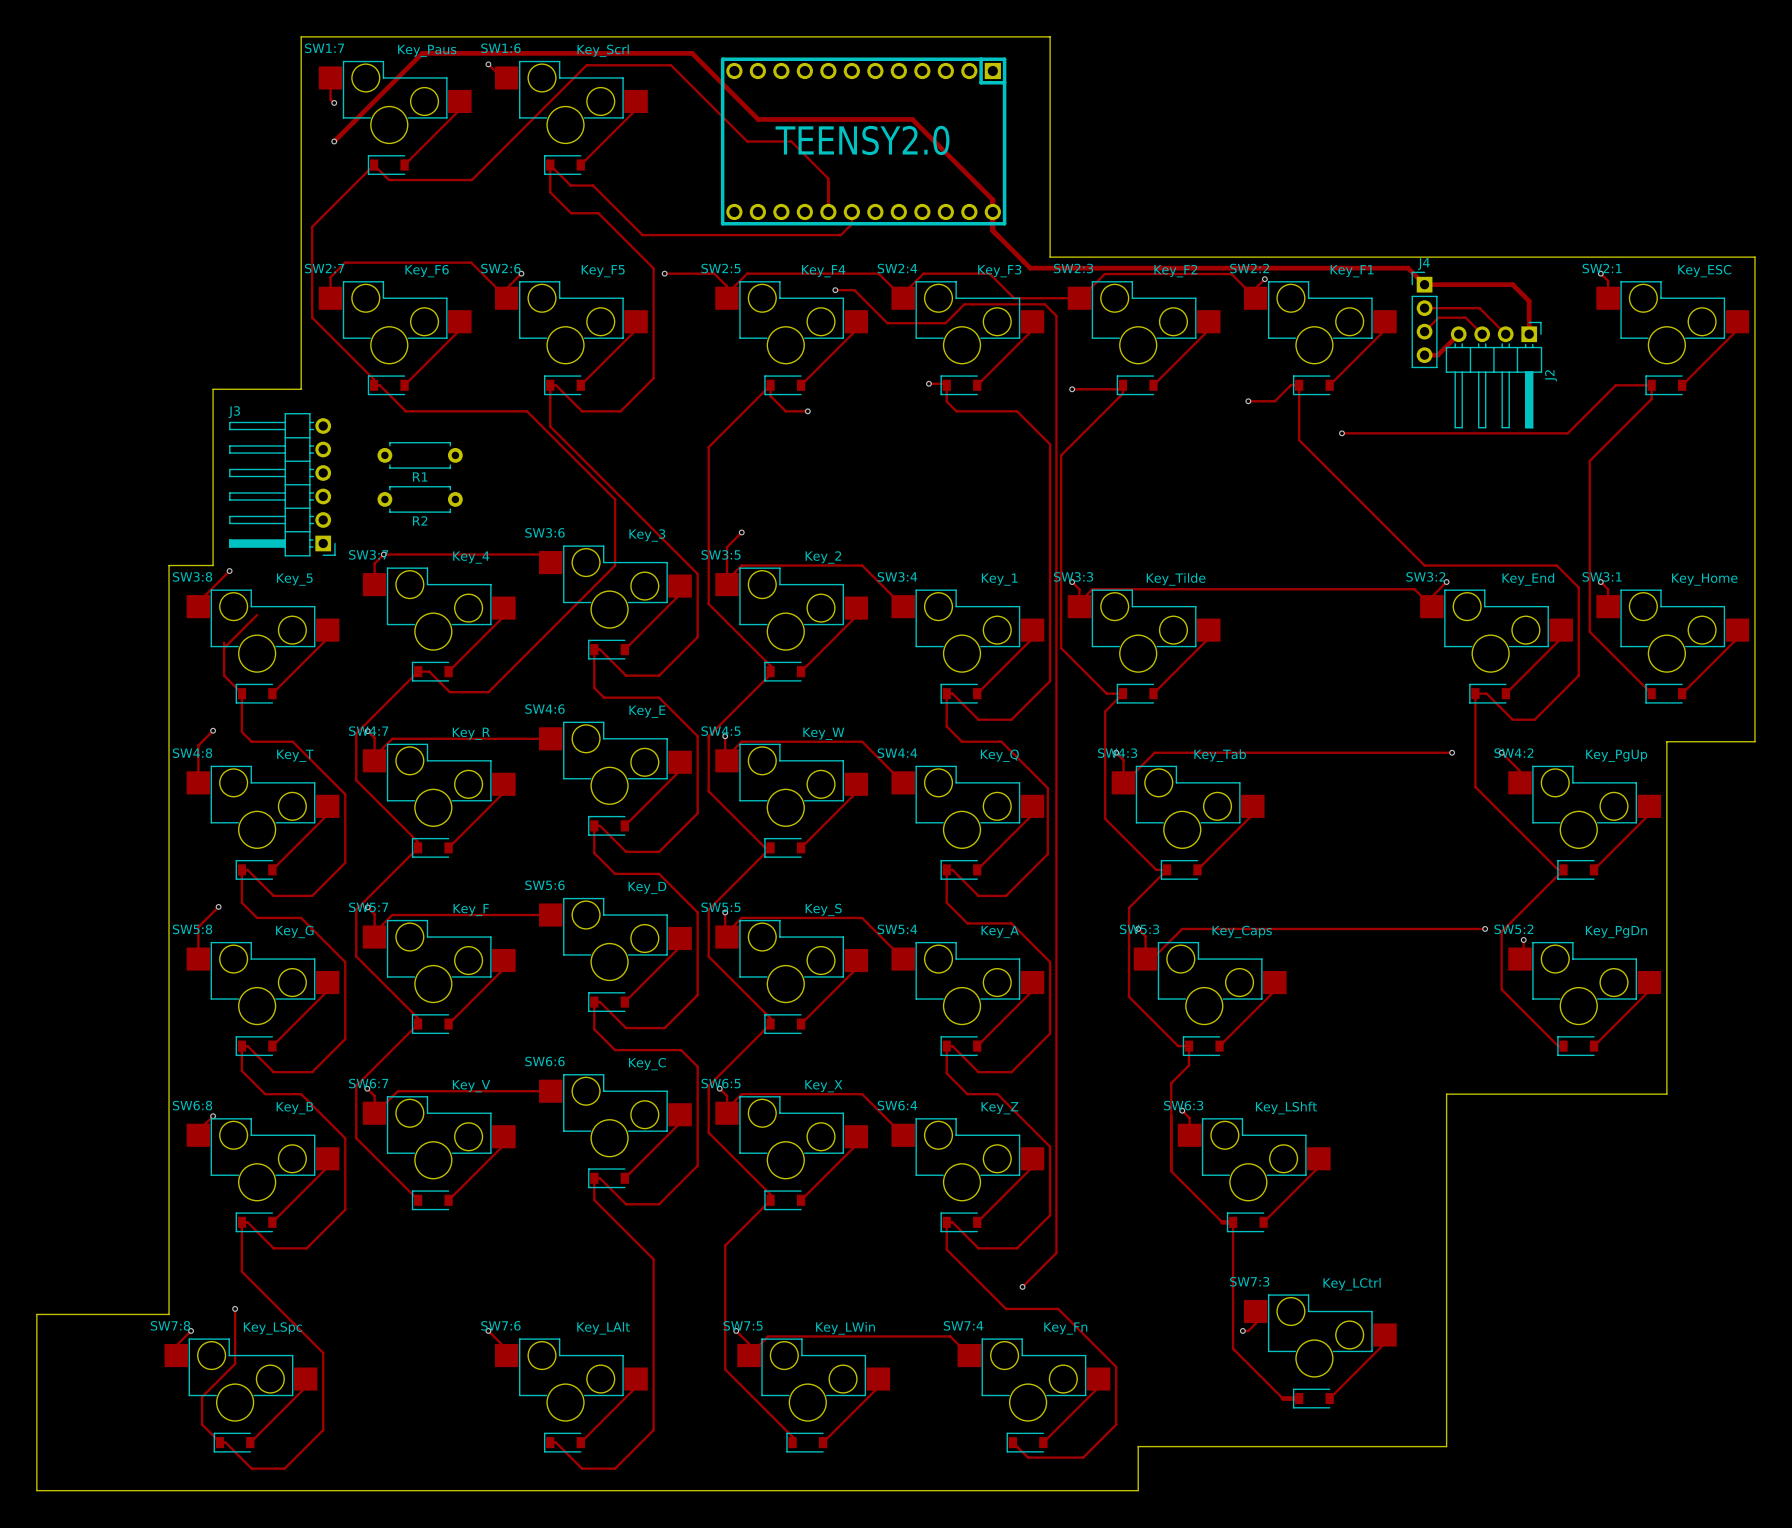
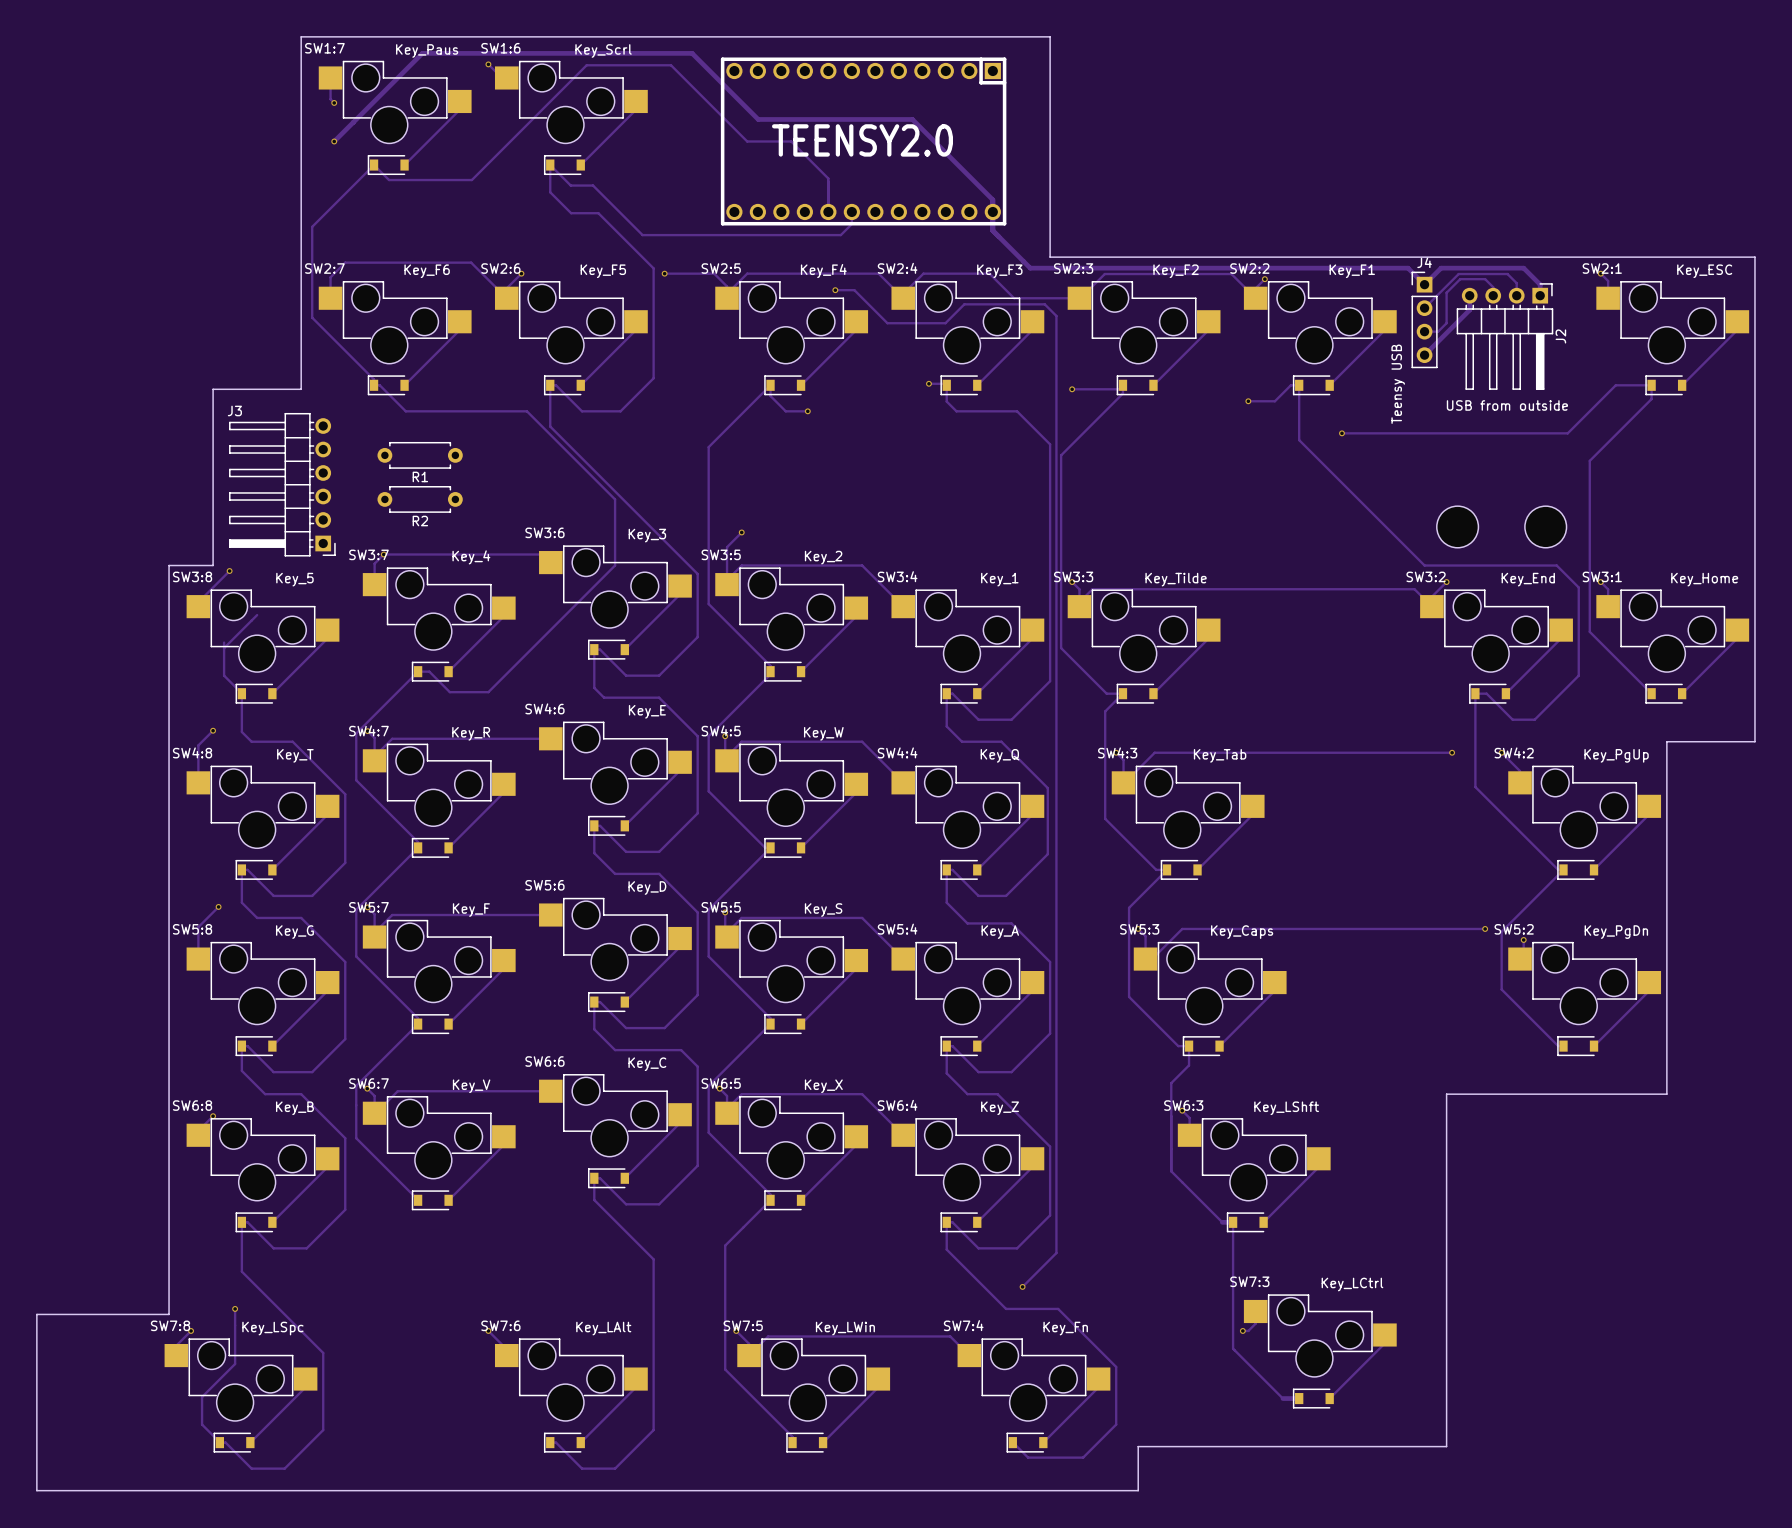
track: (1424, 284) (1512, 284) (1529, 301) (1529, 334) -> (1424, 284) (1441, 268) (1523, 268) (1540, 284) (1540, 295)
track: (1424, 308) (1479, 308) (1505, 334) -> (1424, 308) (1458, 274) (1507, 274) (1516, 283) (1516, 295)
track: (1424, 331) (1438, 317) (1465, 317) (1482, 334) -> (1424, 331) (1438, 331) (1446, 323) (1446, 292) (1460, 279) (1485, 279) (1493, 287) (1493, 295)
track: (1458, 334) (1437, 355) (1424, 355) -> (1469, 295) (1469, 310) (1424, 355)
J2 position: (1493, 375) -> (1504, 336)
J4 value: none -> Teensy USB (1398, 384)
J2 value: none -> USB from outside (1507, 405)
part: none -> (1457, 526)
part: none -> (1545, 526)

